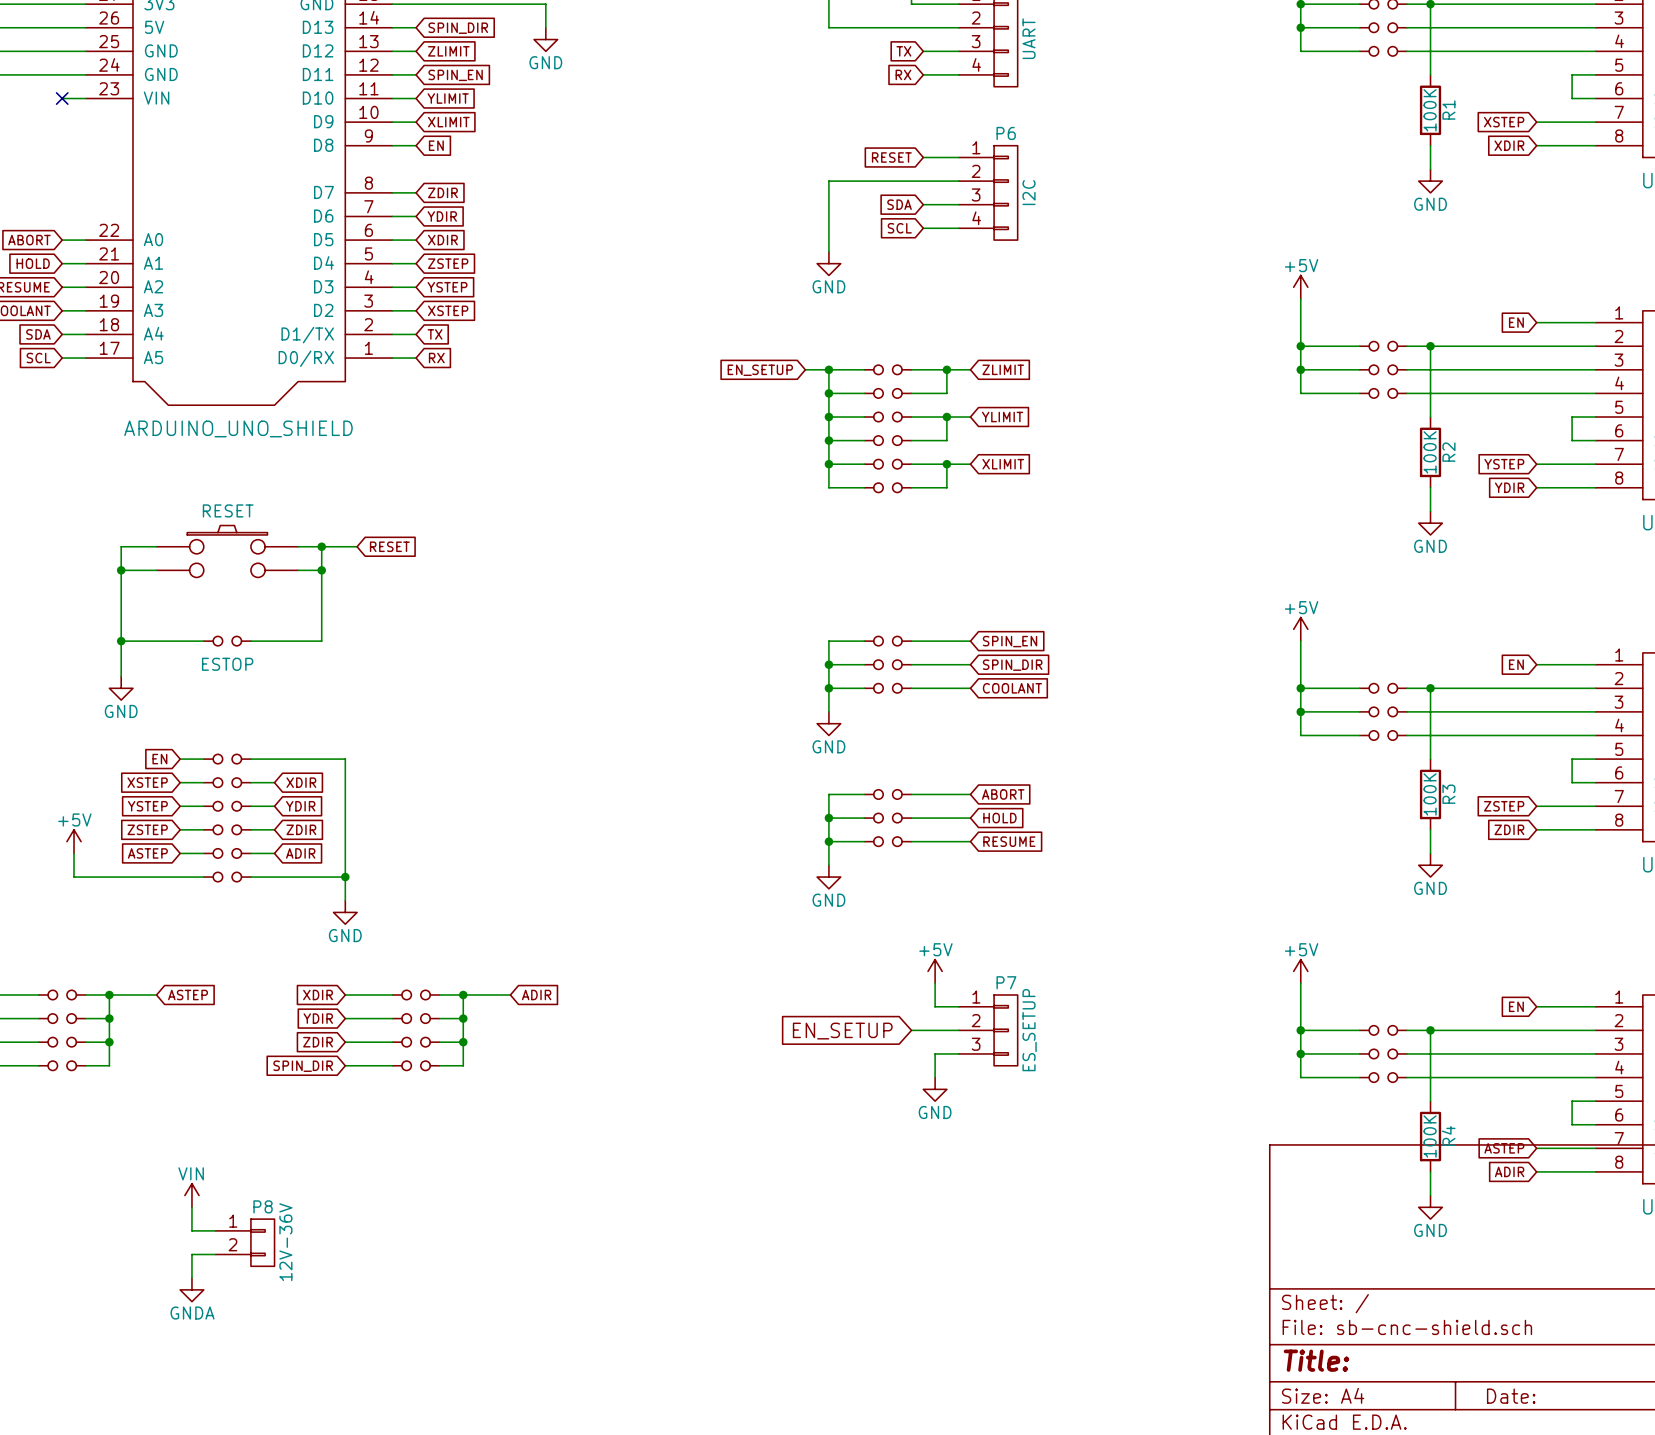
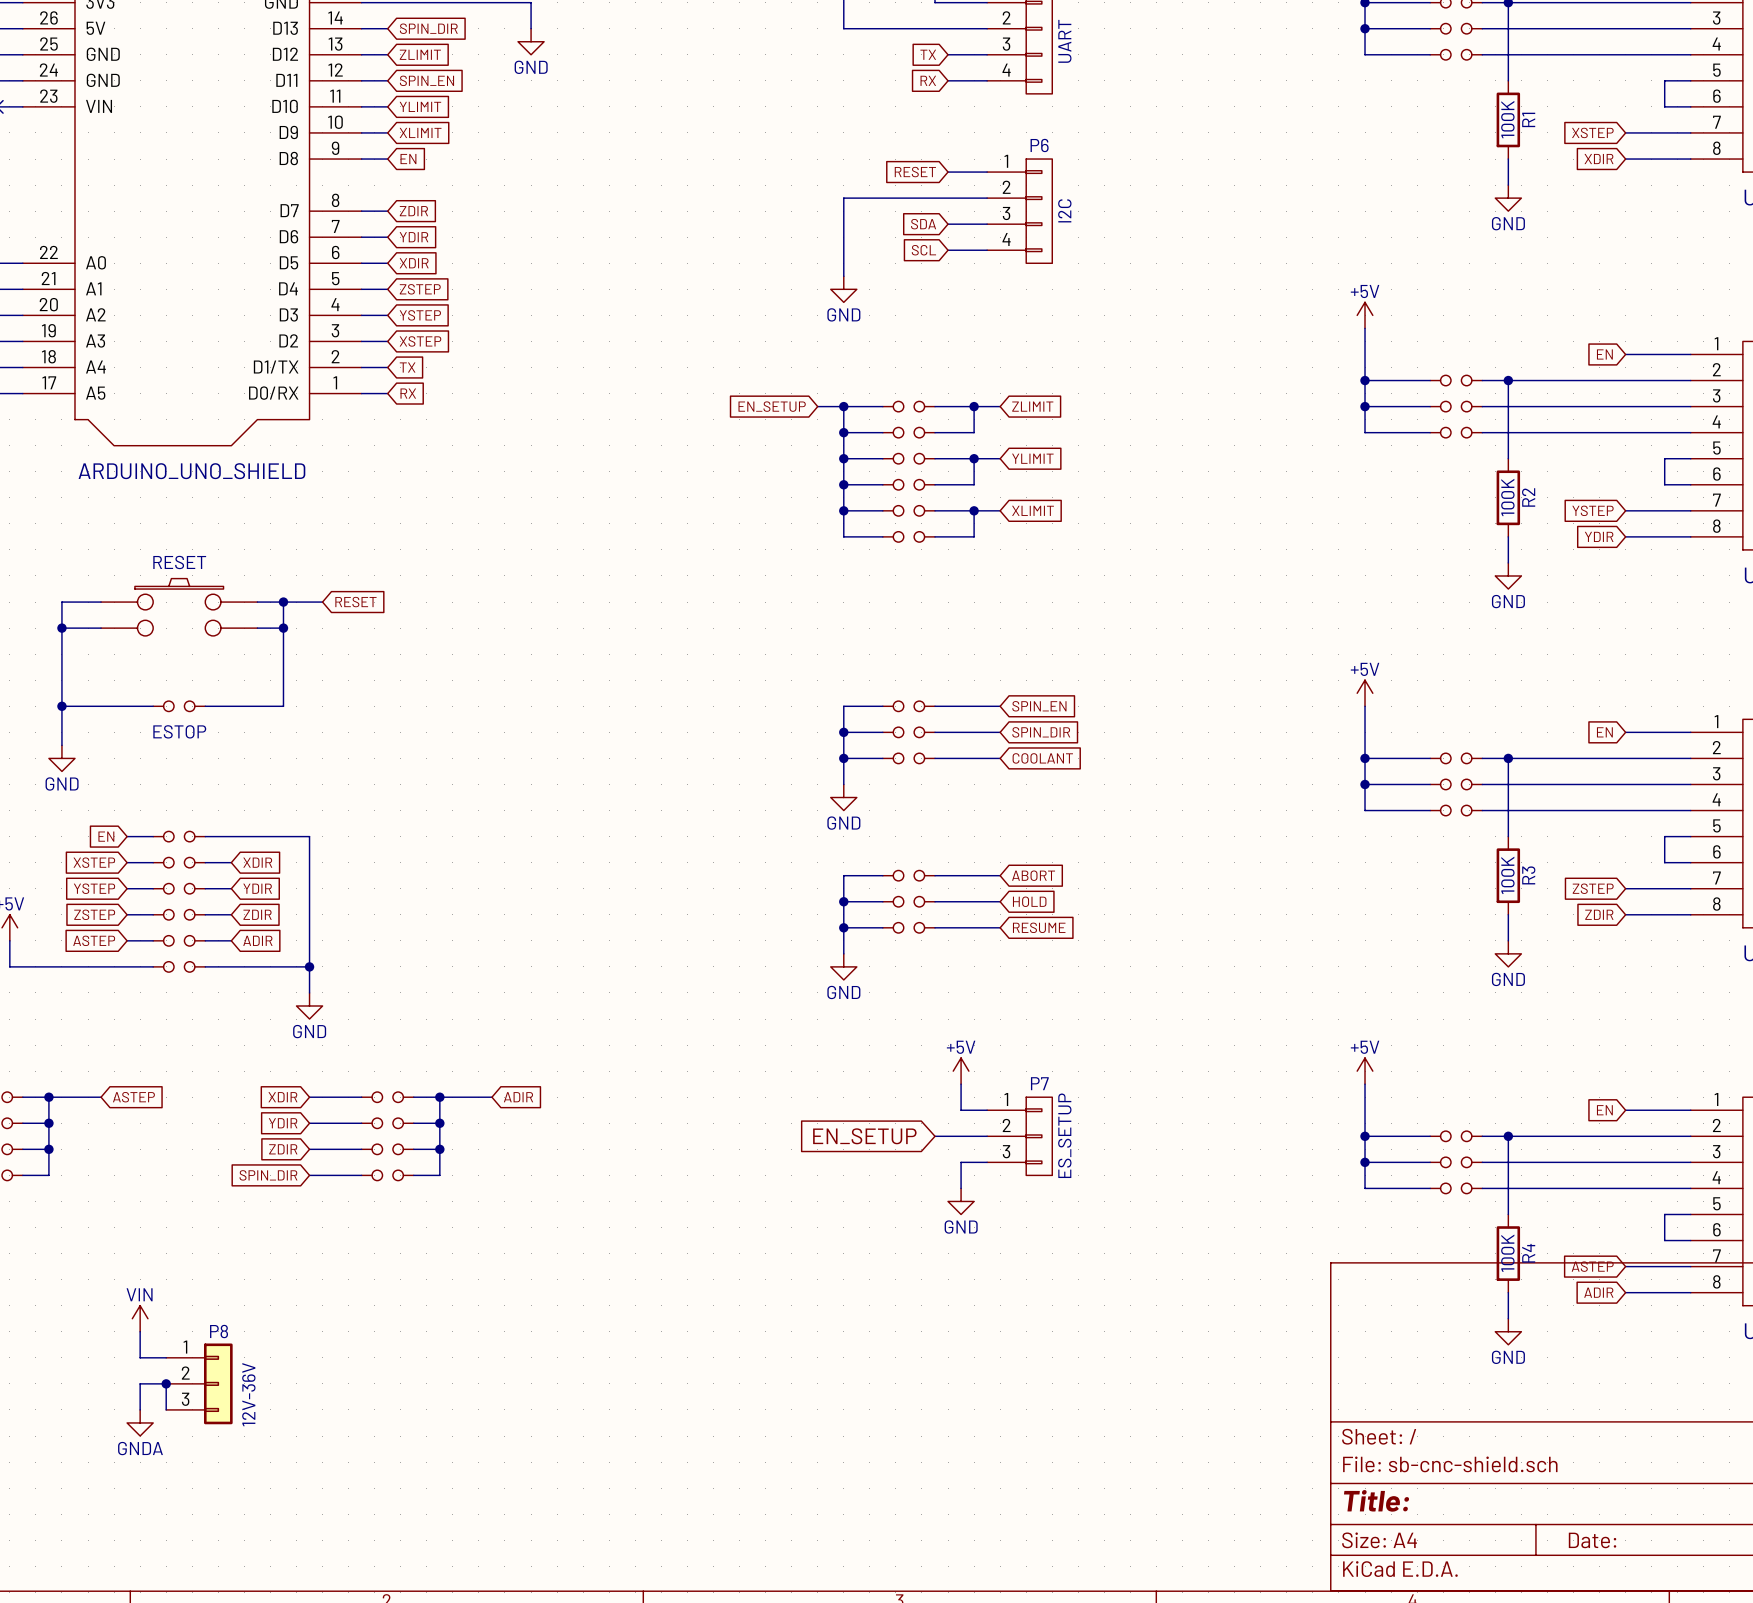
P8 symbol: [215, 1219, 275, 1267] -> [166, 1343, 233, 1425]
wire: none -> (166, 1383) (166, 1409)
junction: none -> (166, 1383)

